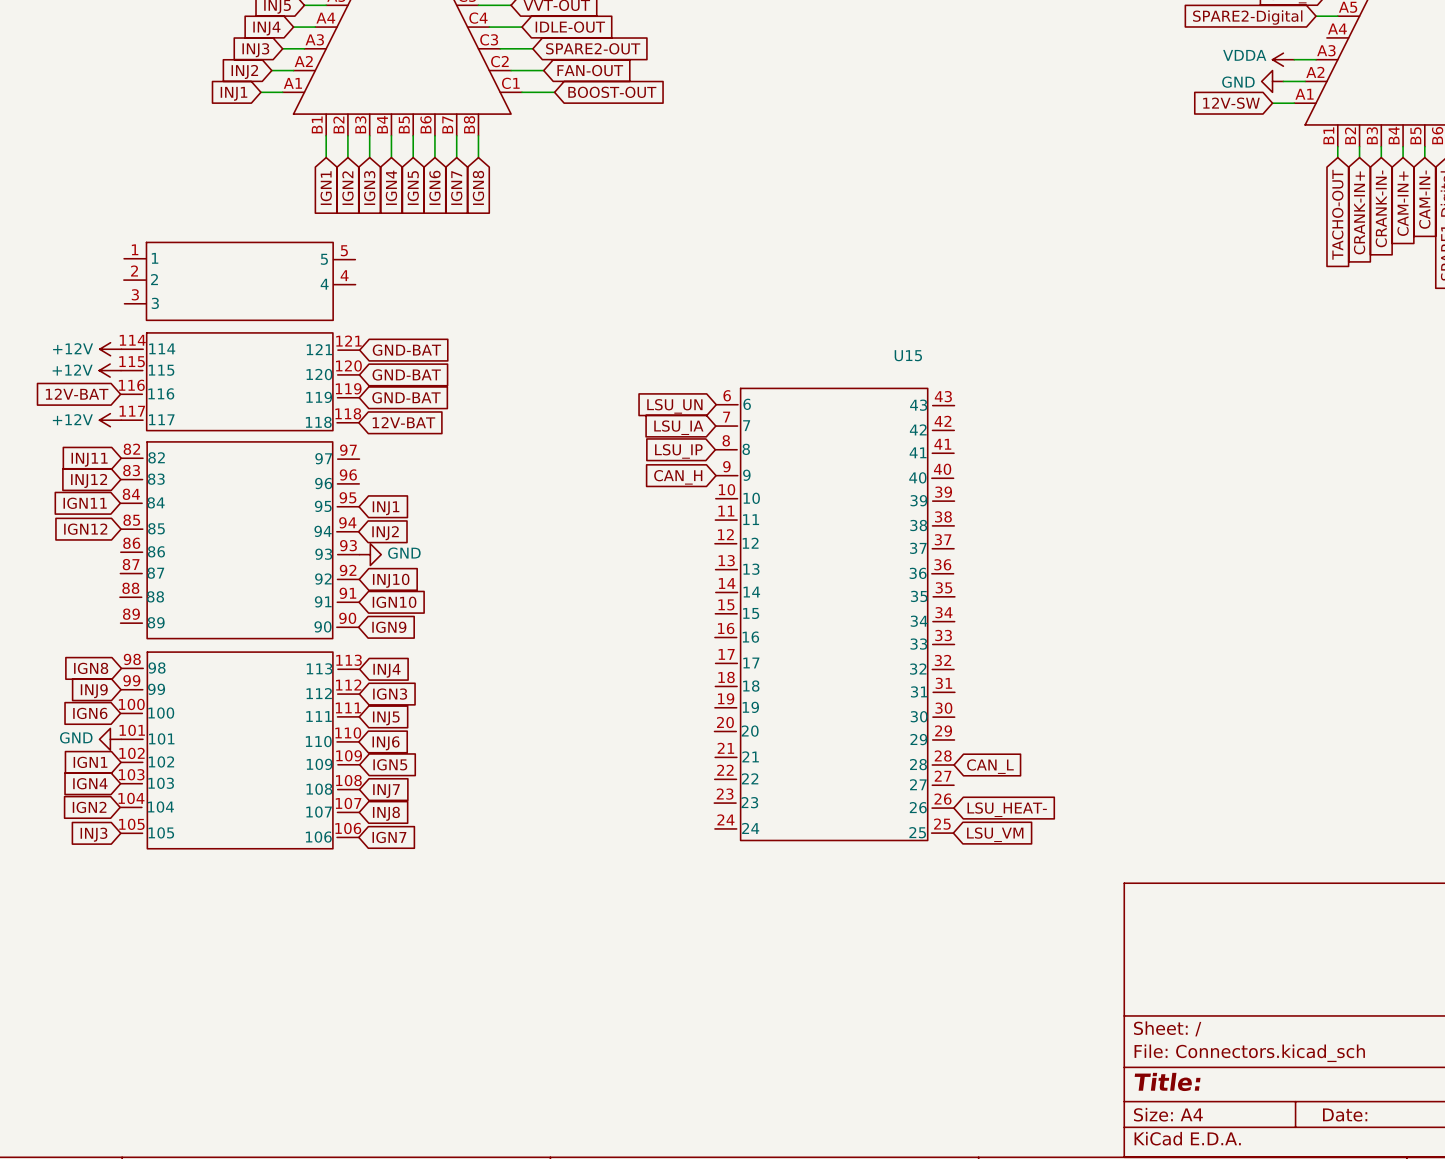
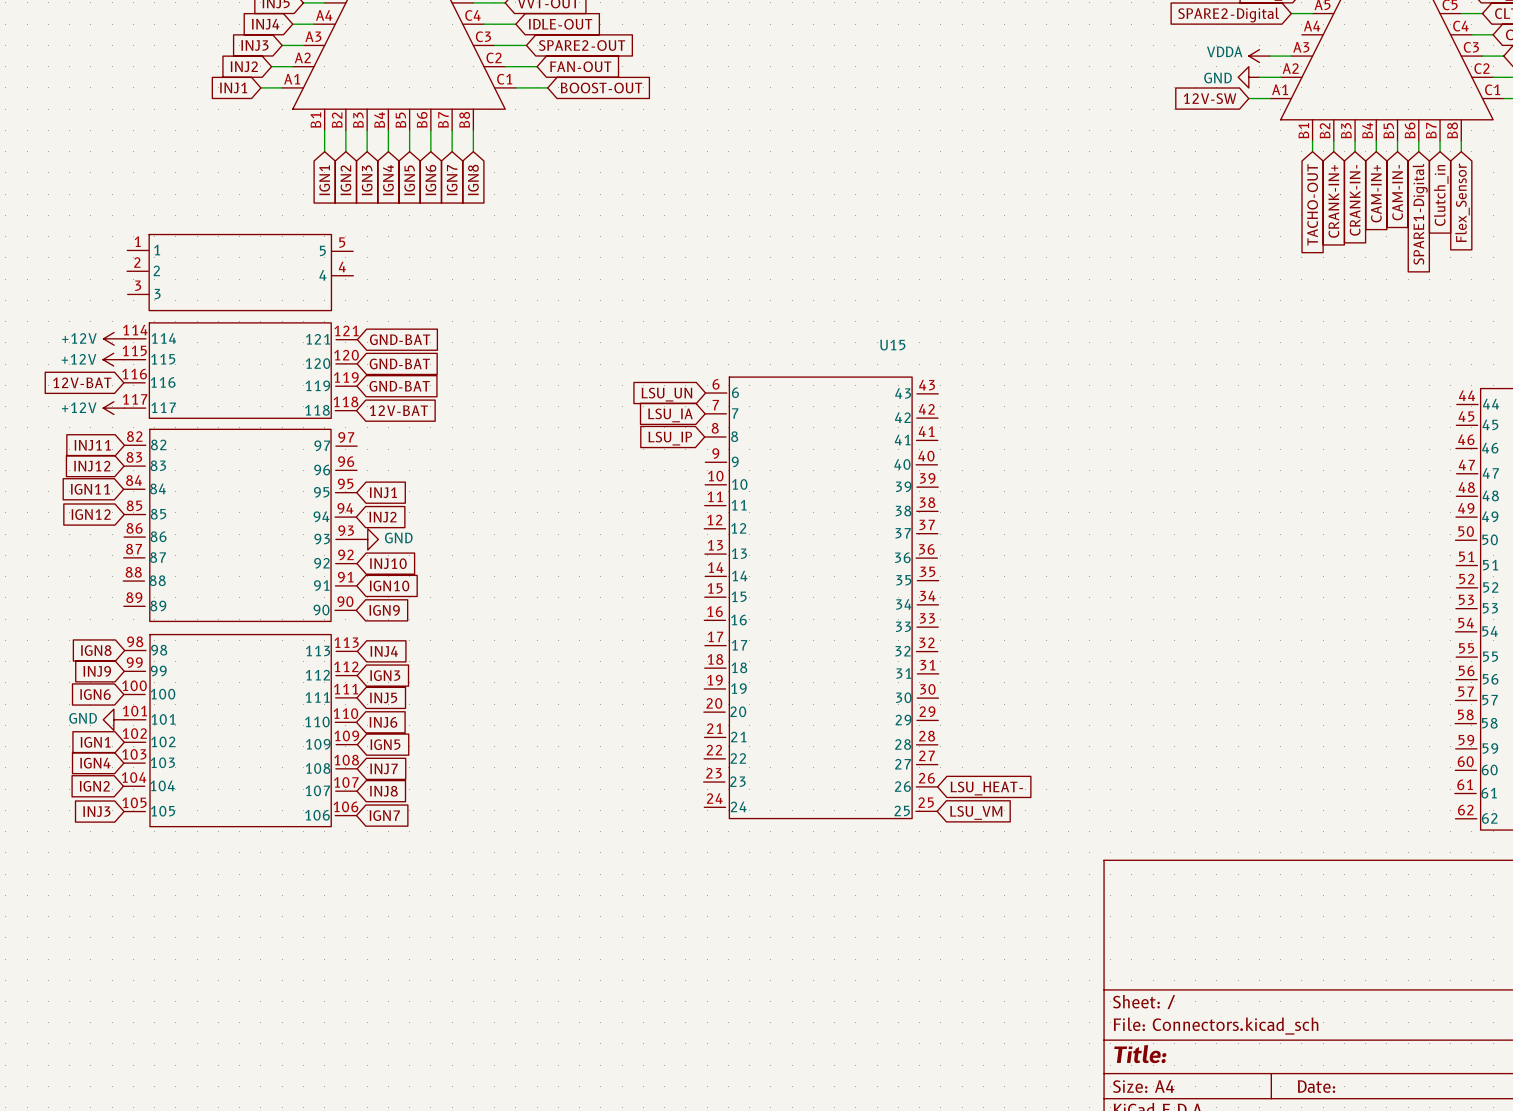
global label: CAN_H (678, 477) -> none
global label: CAN_L (990, 766) -> none

